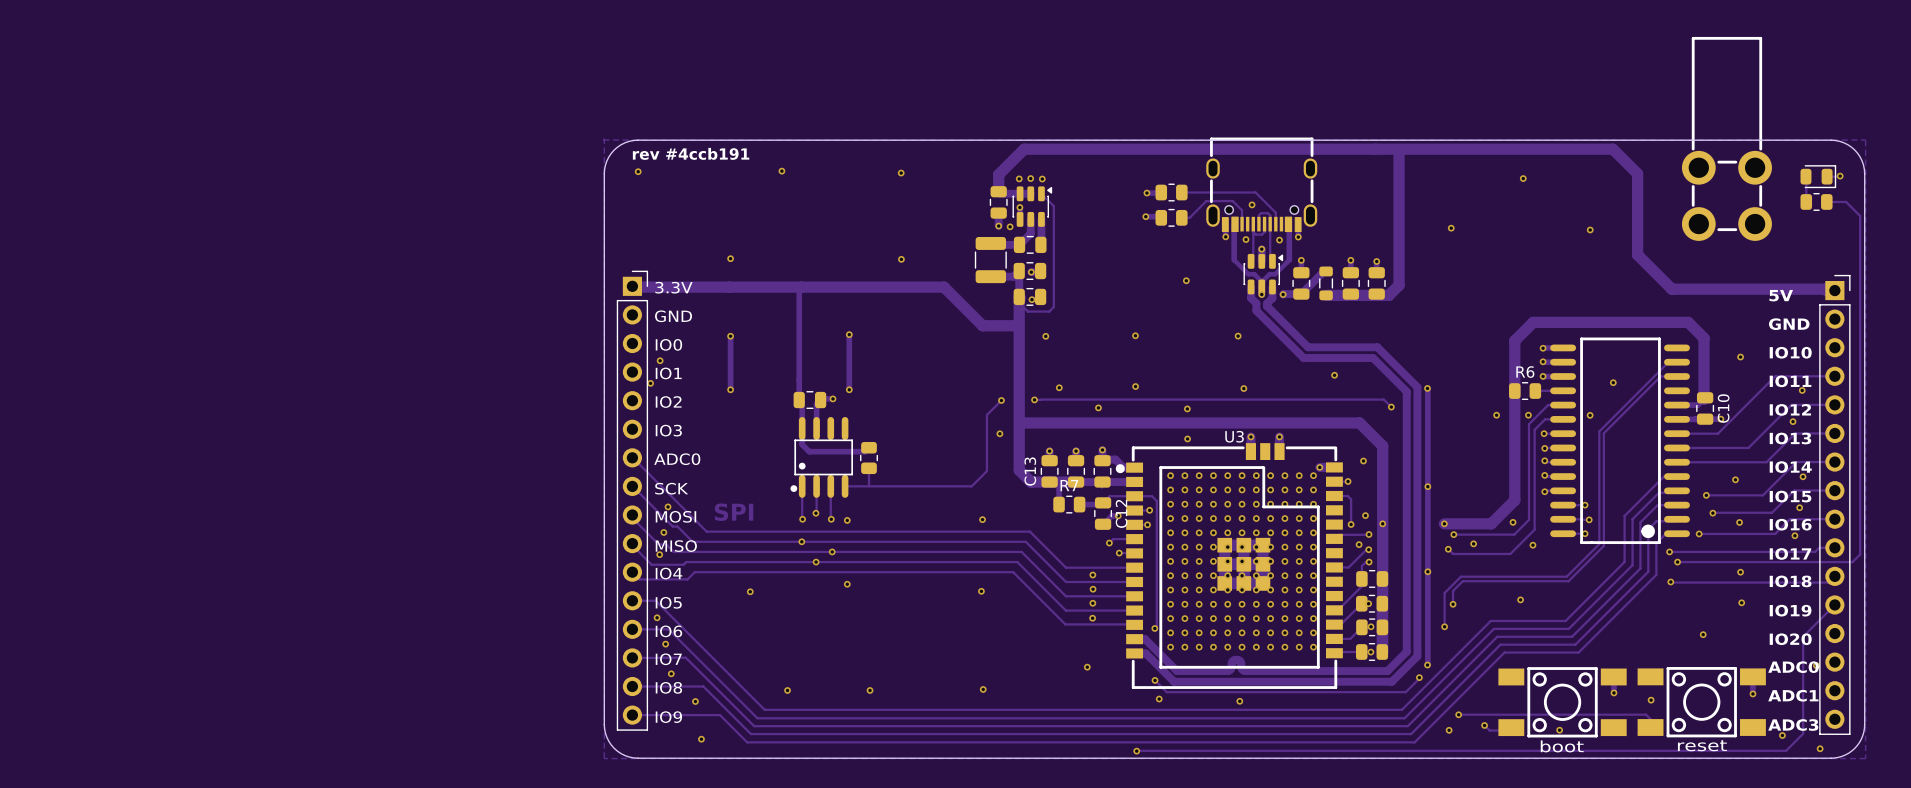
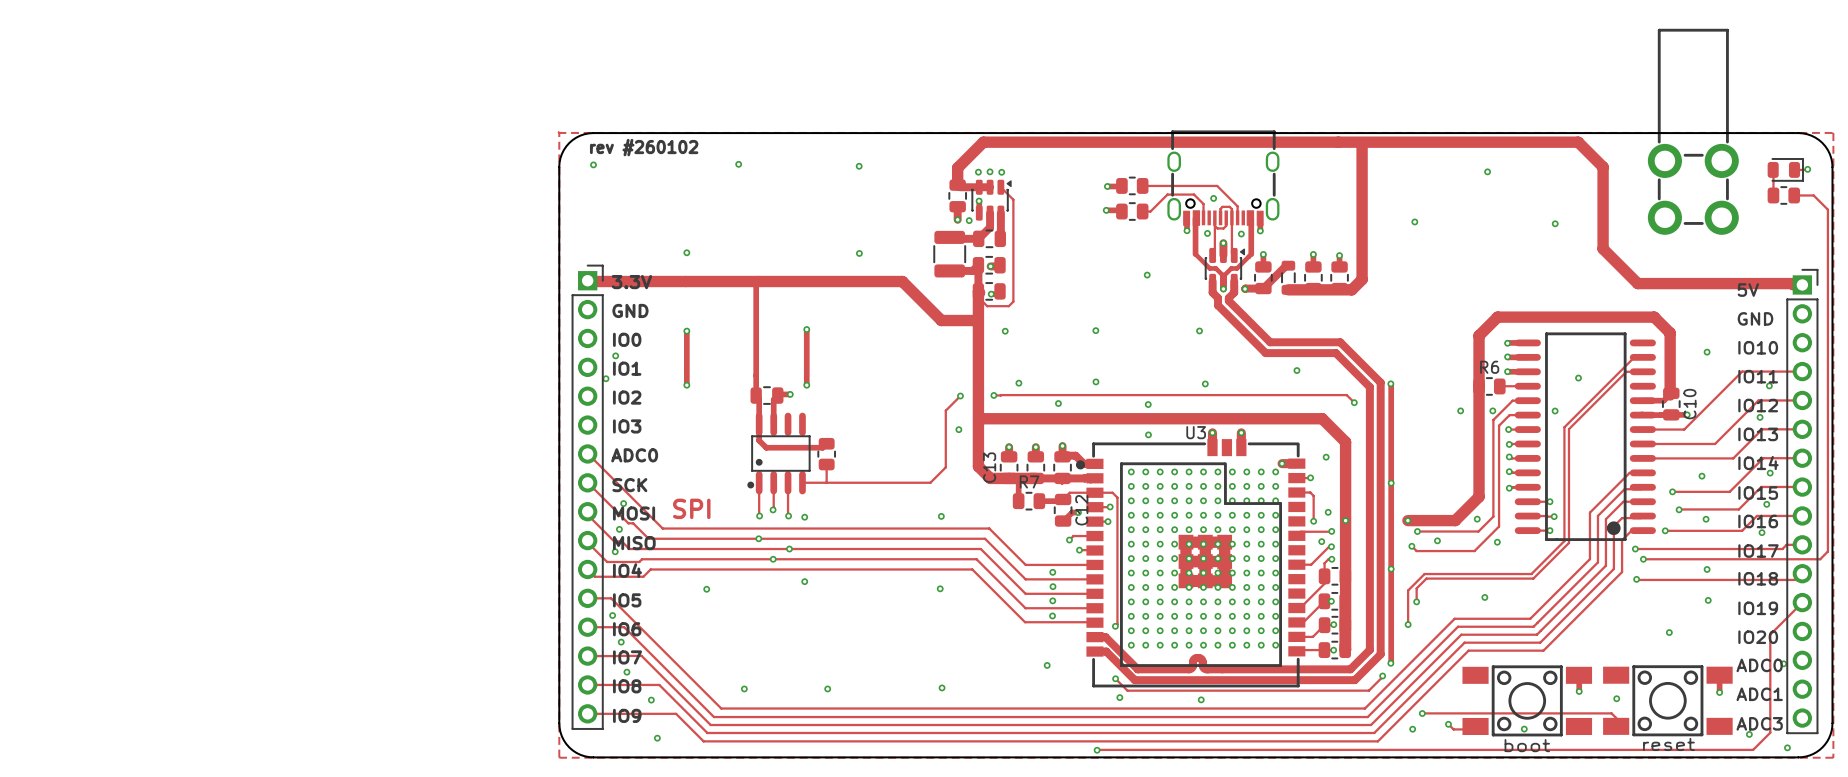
text: rev #4ccb191 (691, 153) -> rev #260102 (644, 147)

